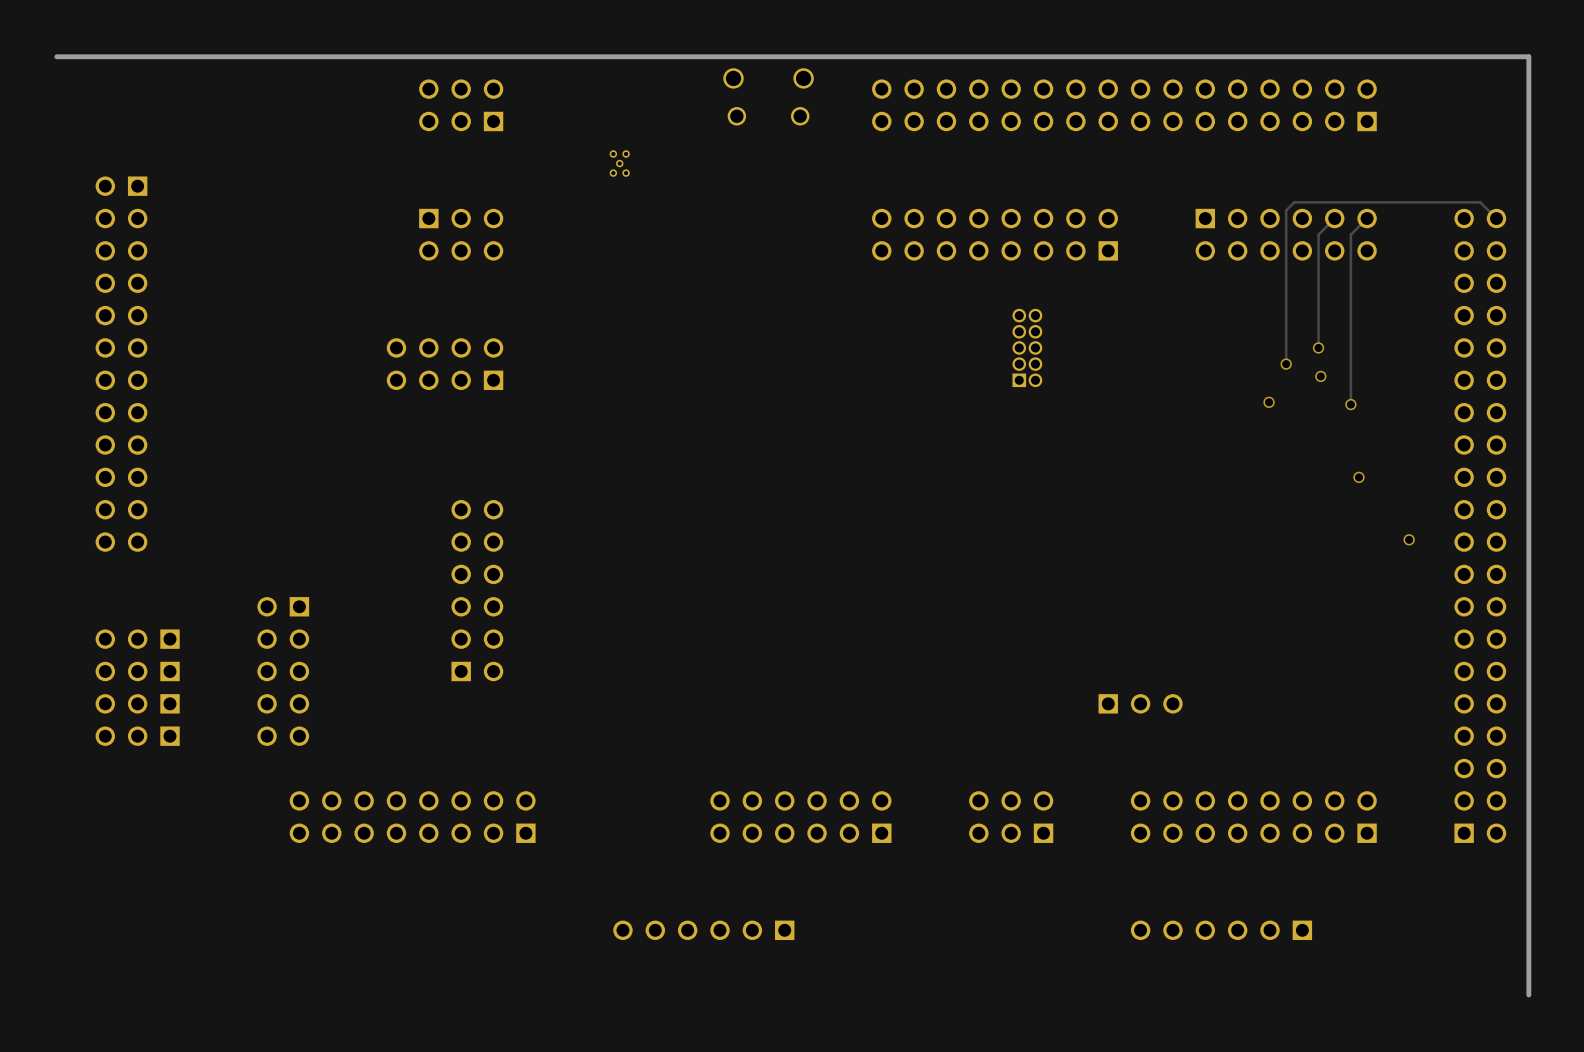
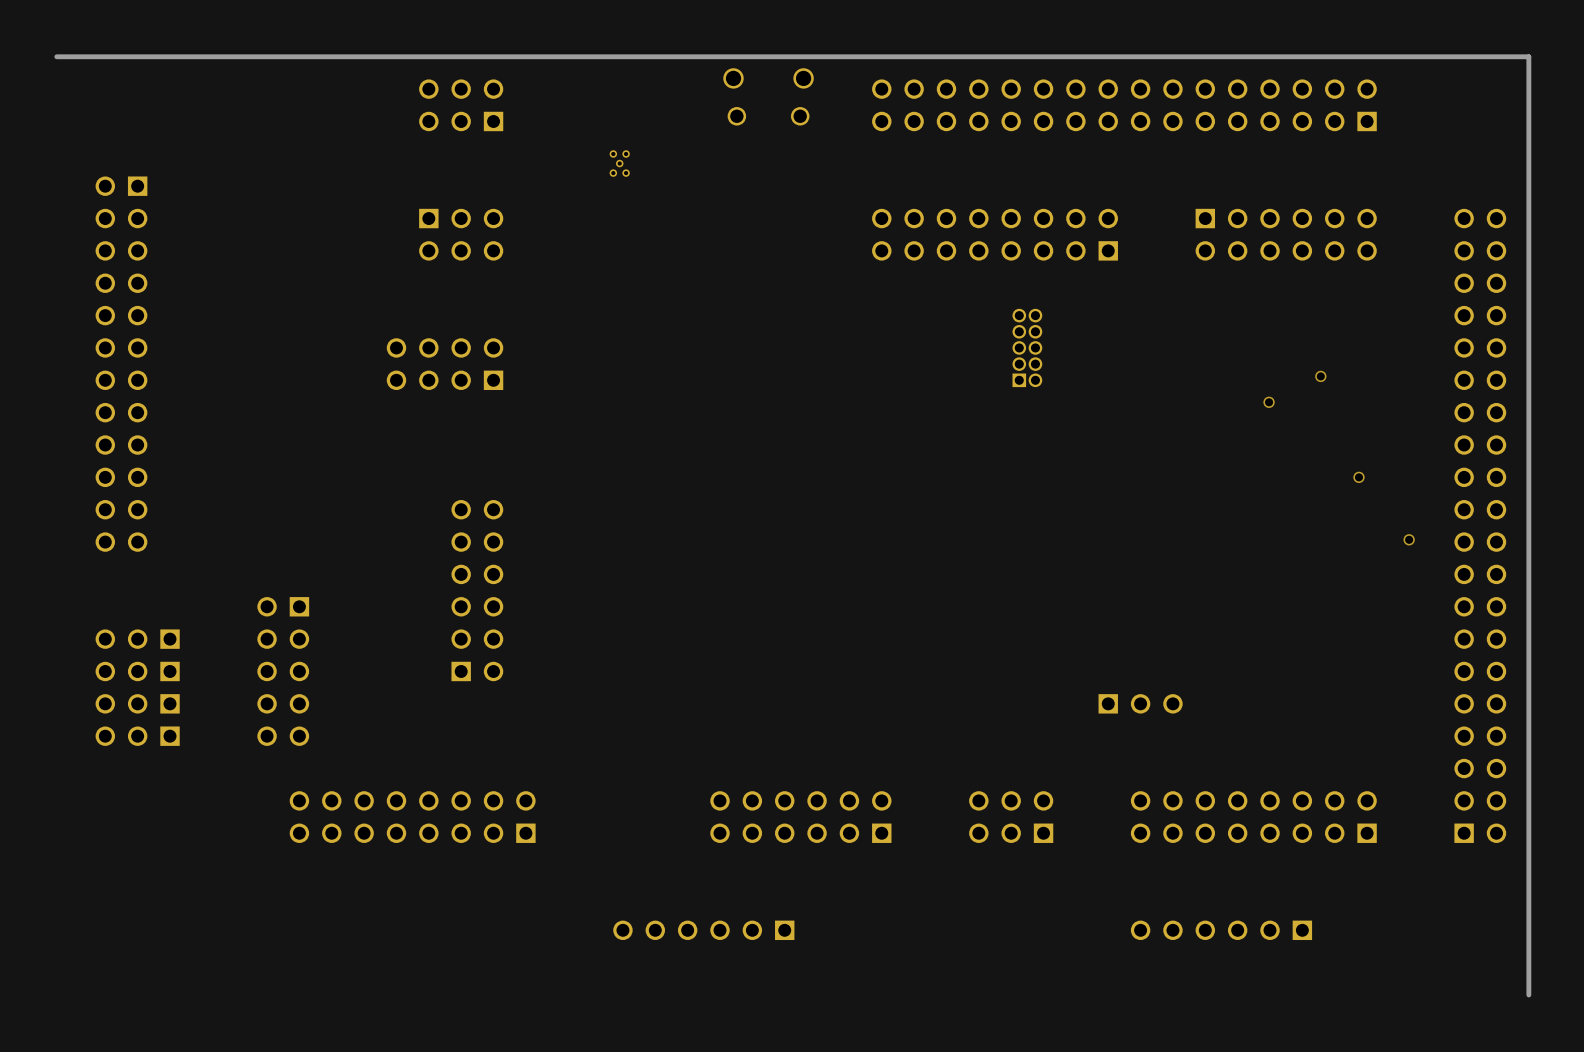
track: (1334, 218) (1318, 234) (1318, 347) -> none
track: (1367, 218) (1350, 234) (1350, 404) -> none
track: (1496, 218) (1480, 202) (1294, 202) (1286, 210) (1286, 364) -> none
via: (1318, 347) -> none
via: (1286, 364) -> none
via: (1350, 404) -> none

